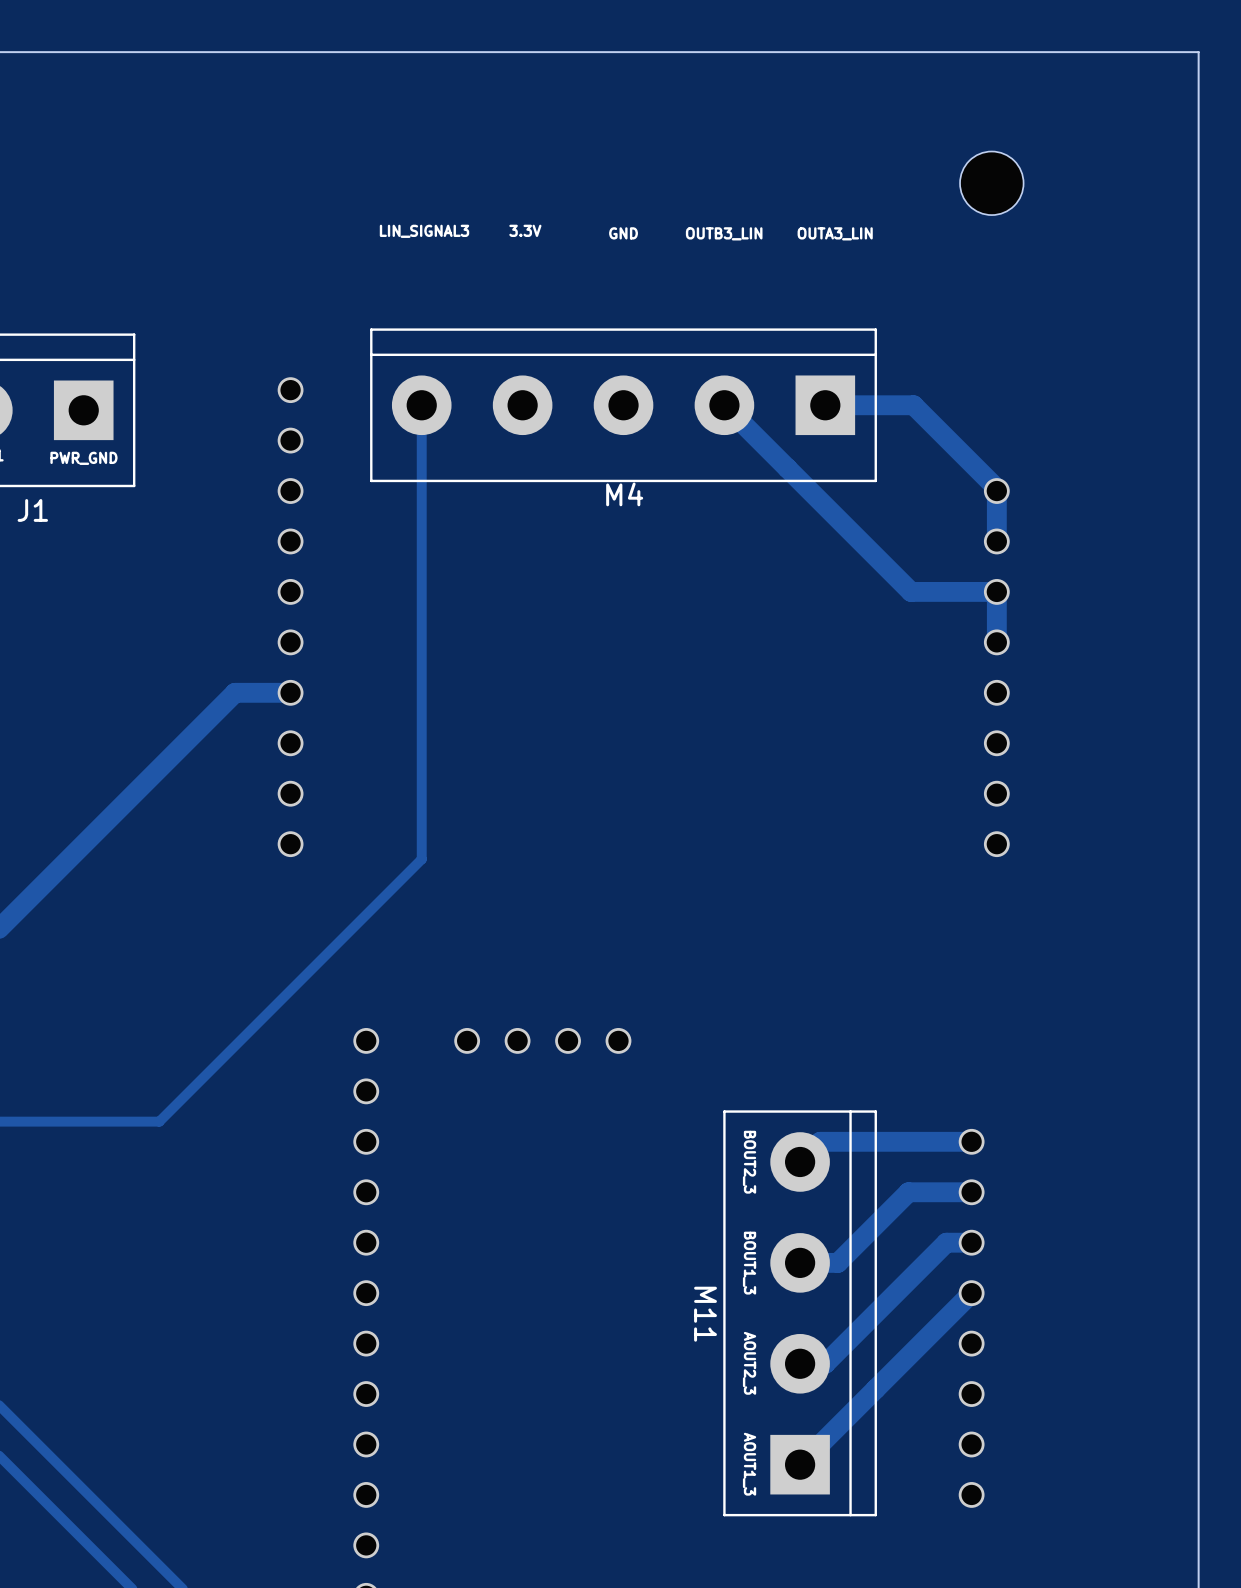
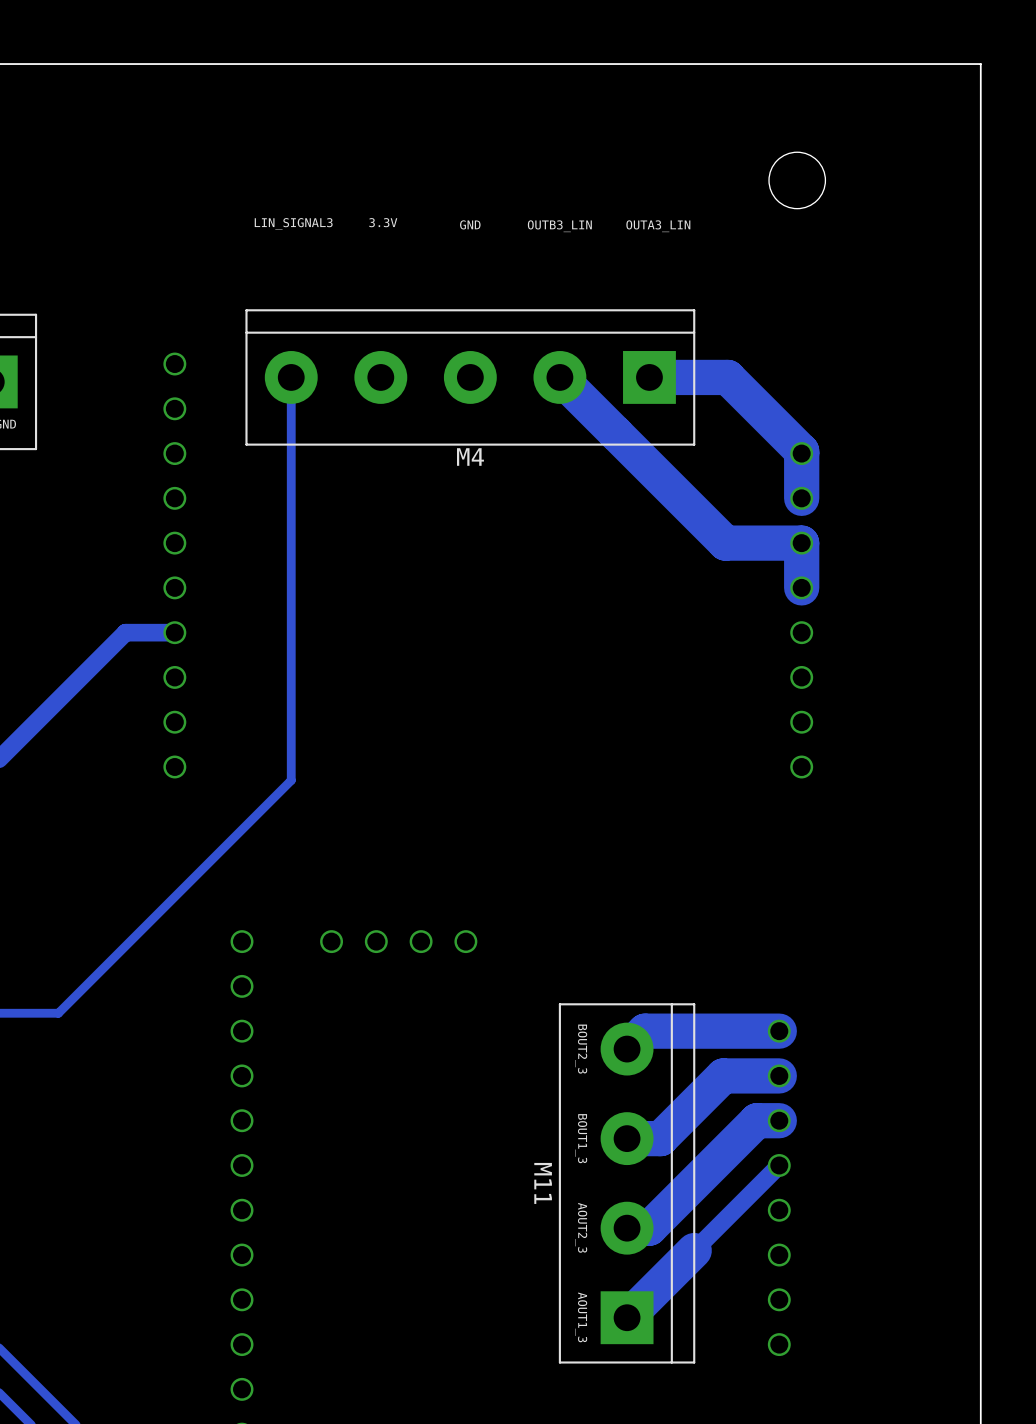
track width: thin (724, 405) (911, 591) (996, 591) (996, 642) -> thick (559, 377) (725, 543) (801, 543) (801, 587)
track width: thin (825, 405) (913, 405) (996, 488) (996, 541) -> thick (649, 377) (727, 377) (801, 451) (801, 498)
track width: thin (971, 1141) (820, 1141) (800, 1161) -> thick (779, 1031) (644, 1031) (627, 1049)
track width: thin (971, 1192) (908, 1192) (837, 1262) (800, 1262) -> thick (779, 1075) (723, 1075) (660, 1138) (627, 1138)
track width: thin (971, 1242) (946, 1242) (825, 1363) (800, 1363) -> thick (779, 1120) (756, 1120) (649, 1228) (627, 1228)
track width: thin (875, 1389) (800, 1464) -> thick (694, 1250) (627, 1317)

